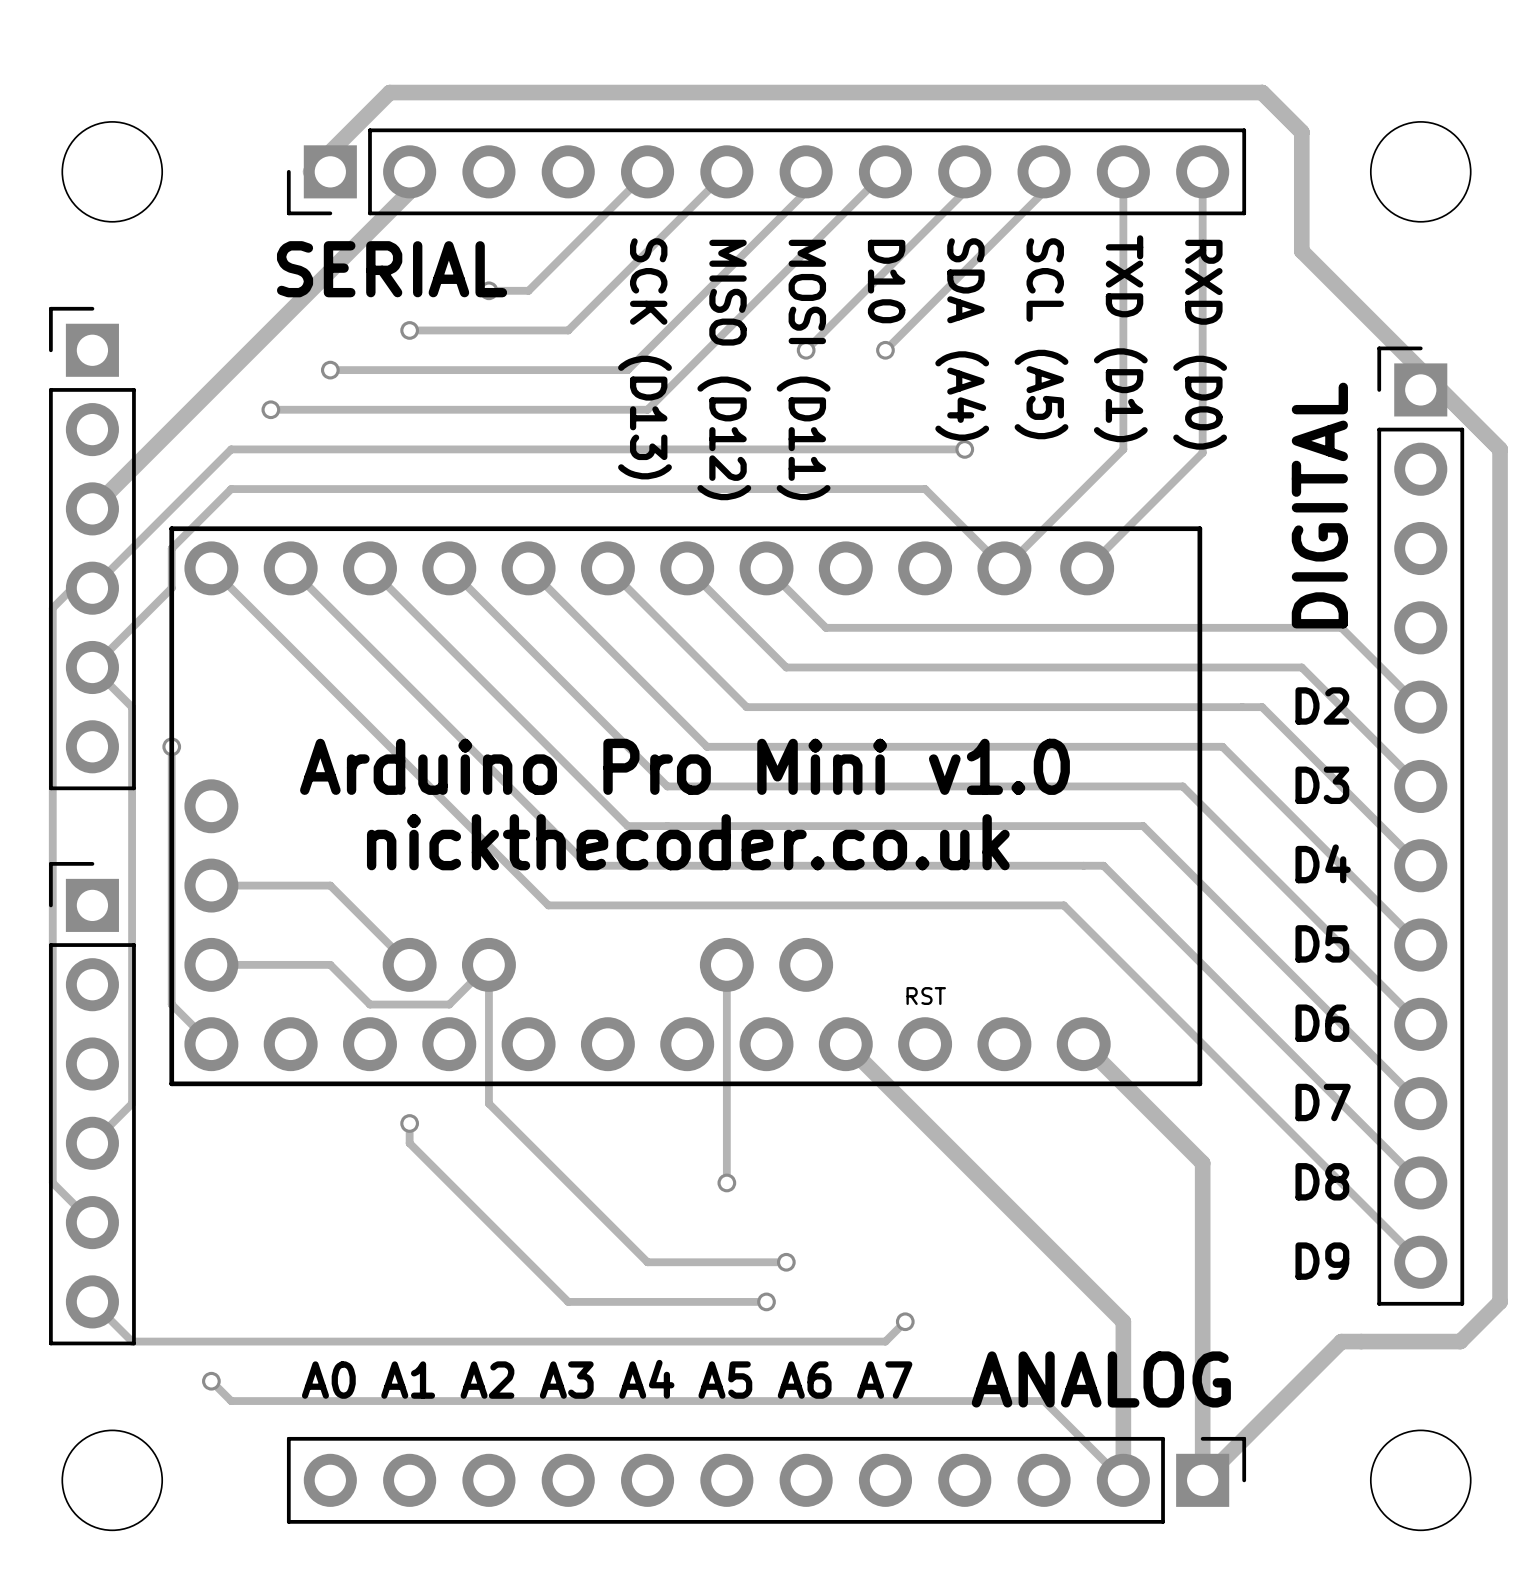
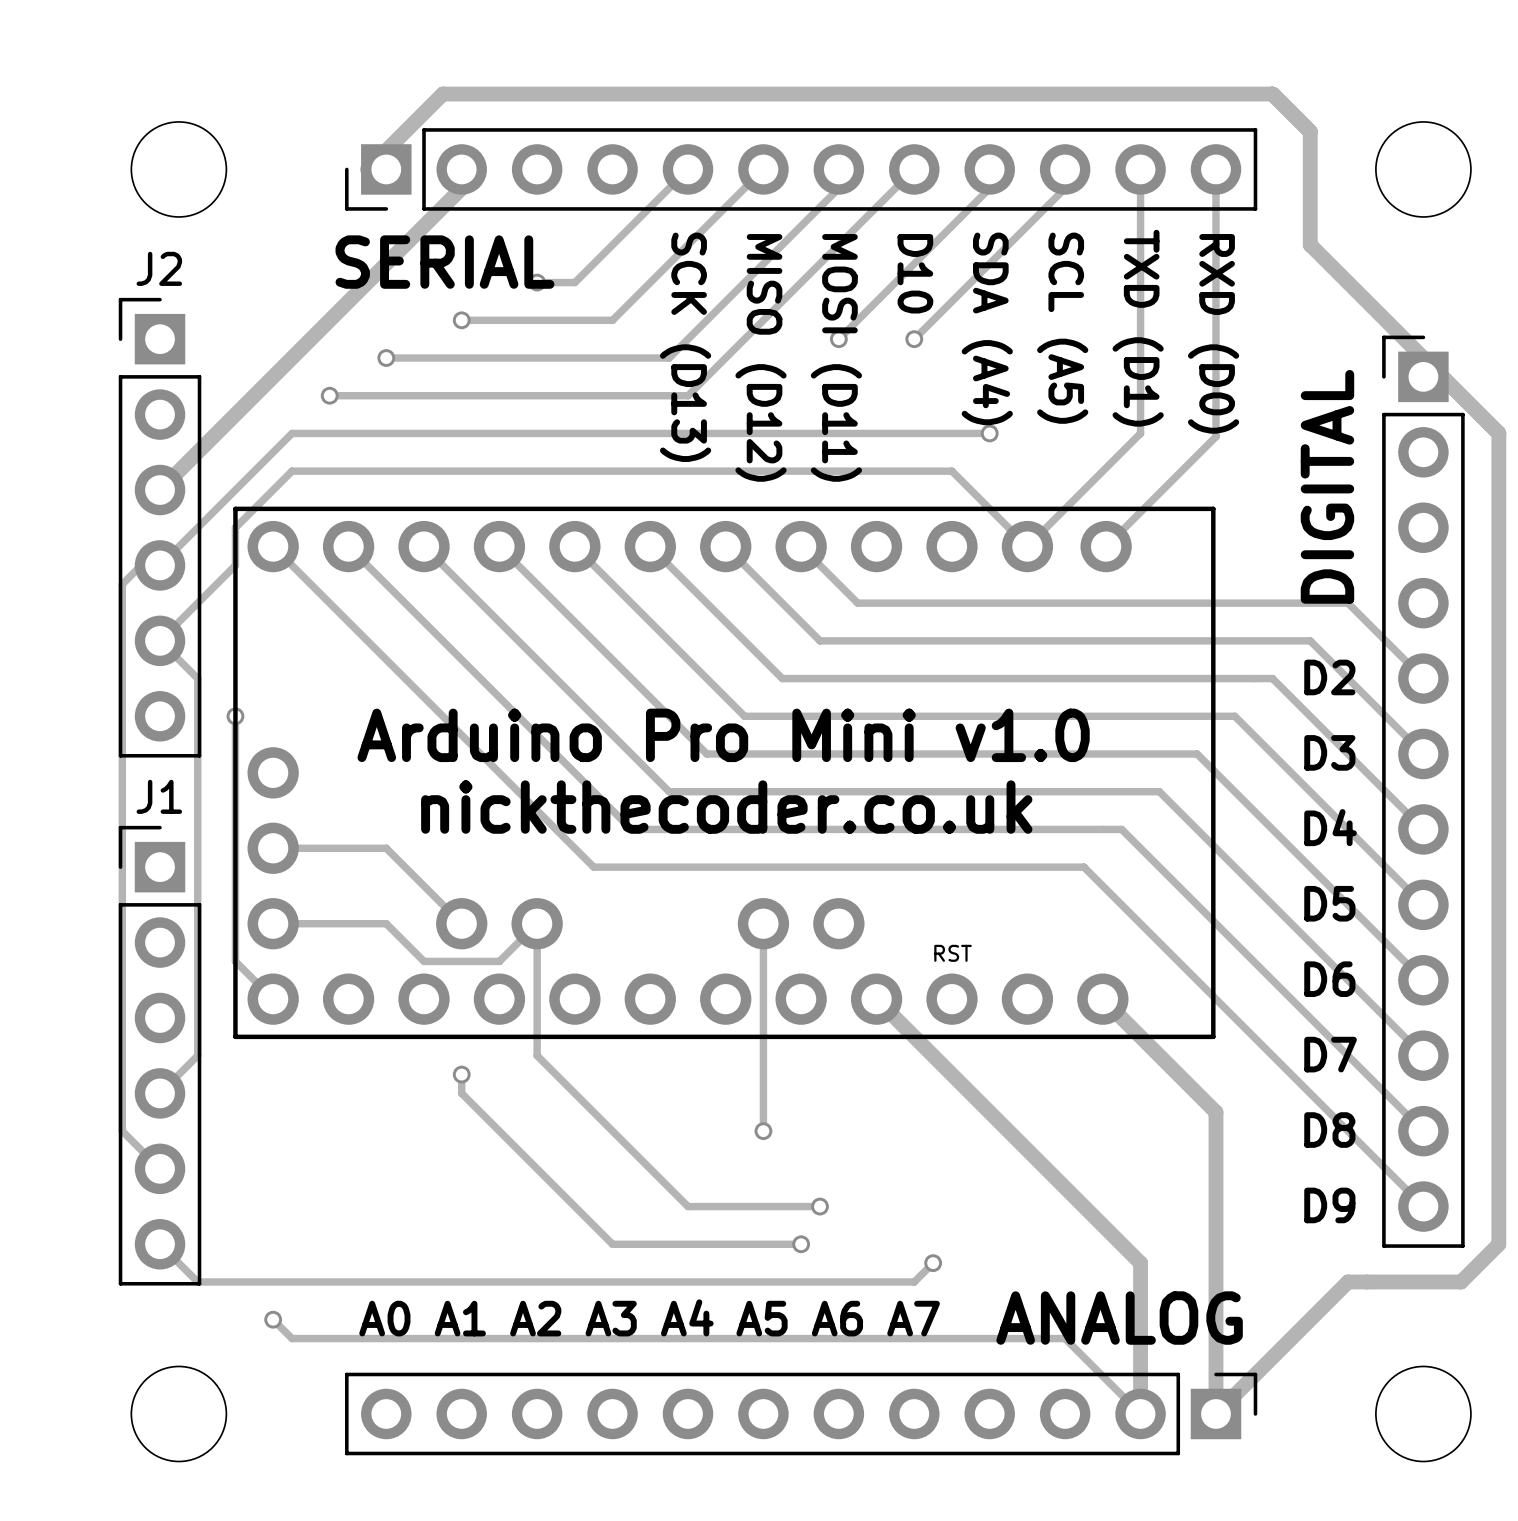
J2 name: none -> J2 (159, 268)
J1 name: none -> J1 (159, 796)

